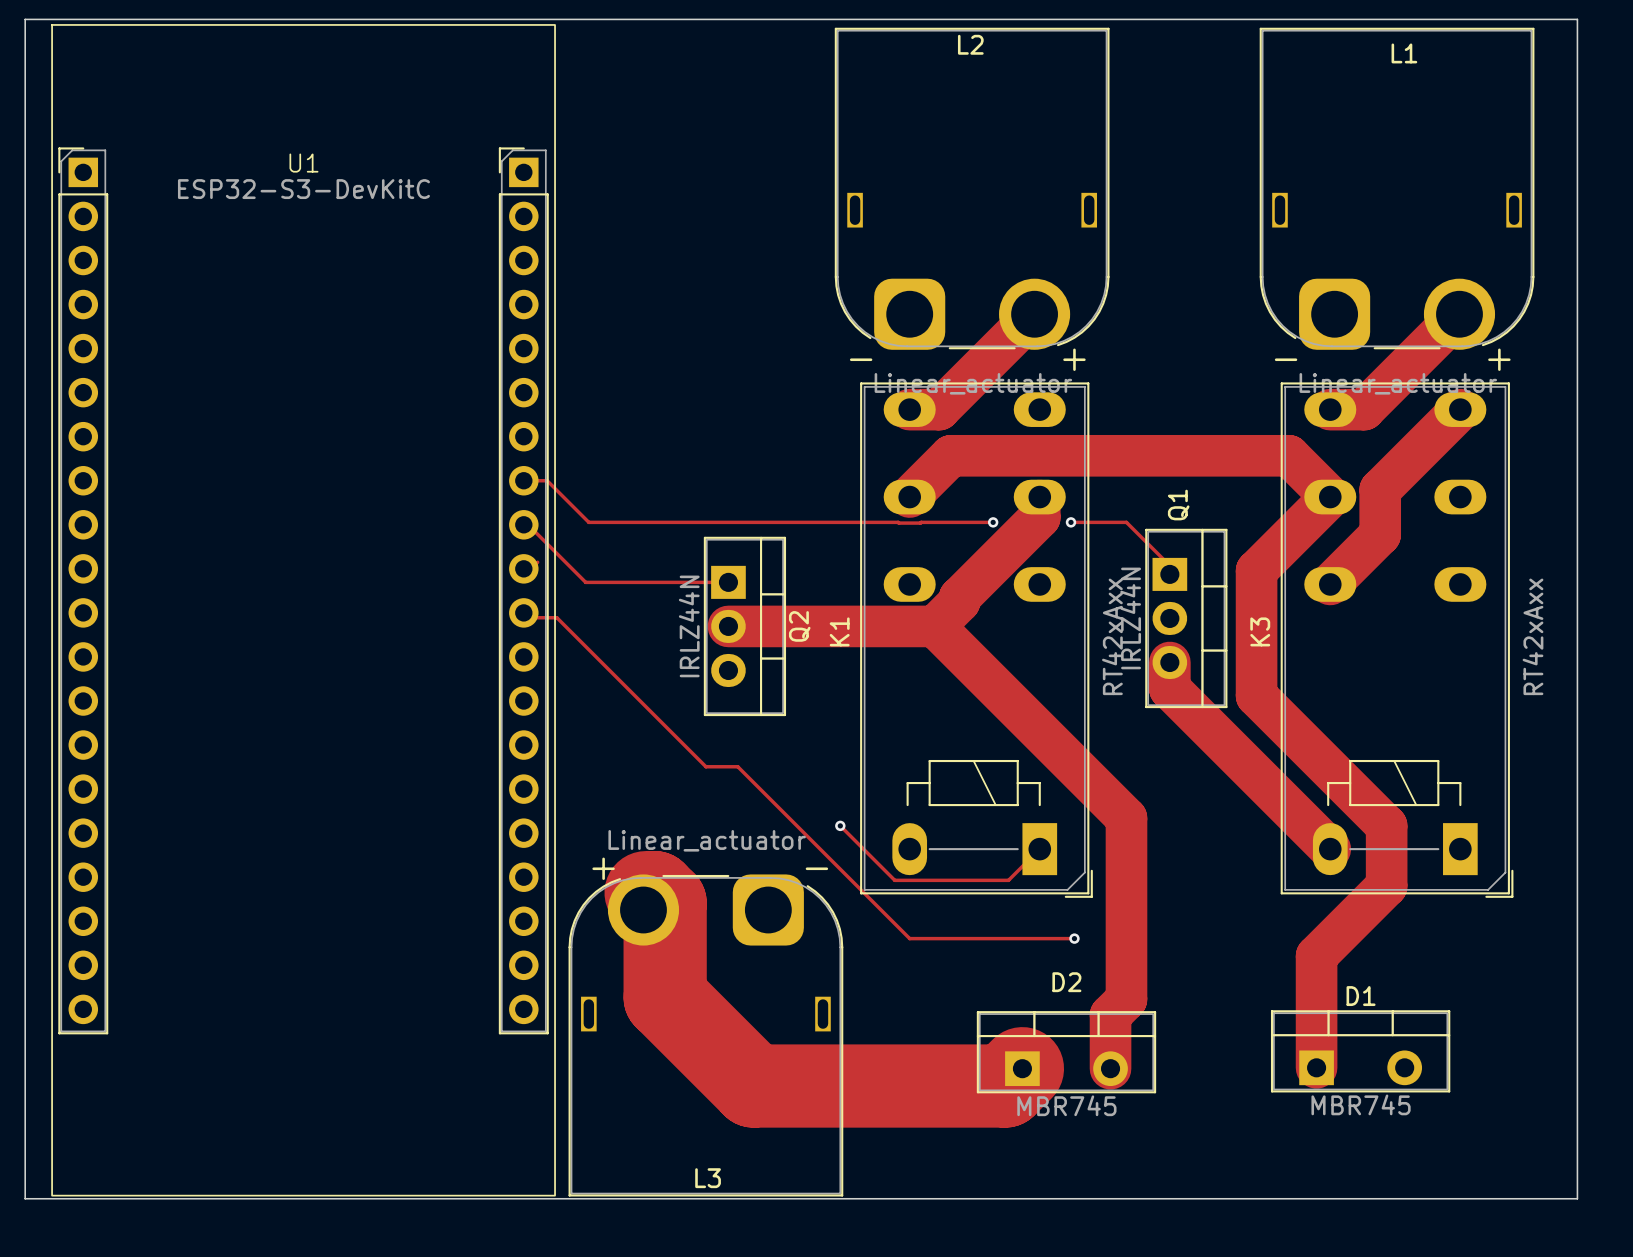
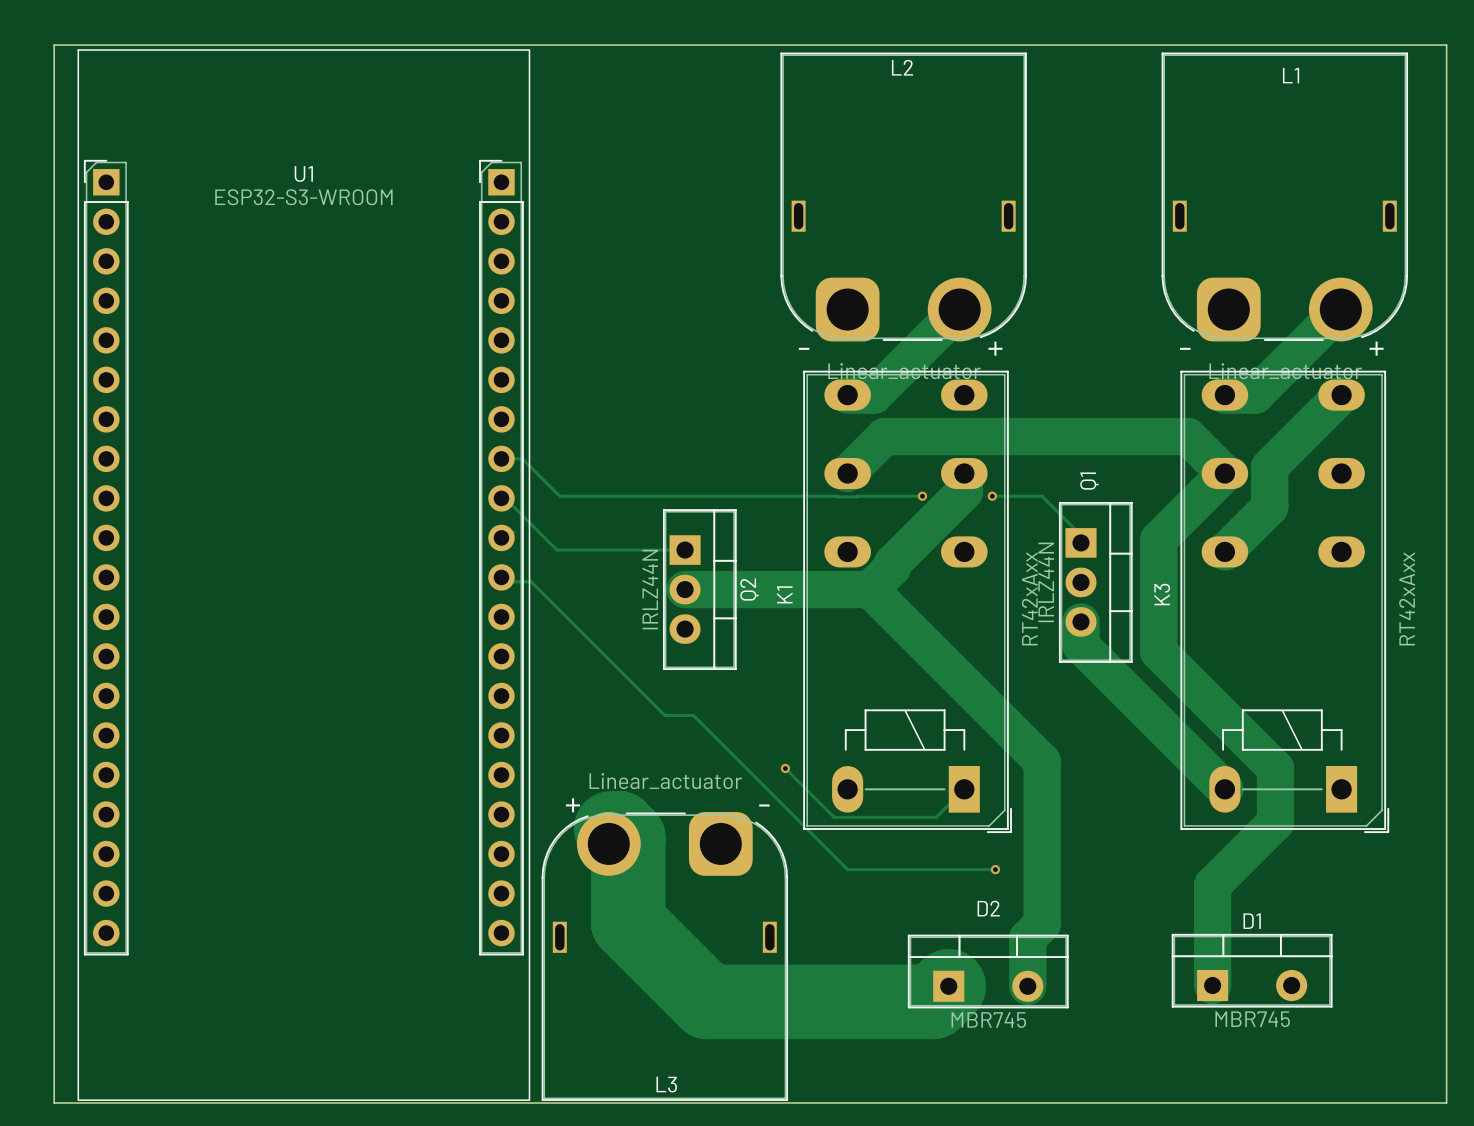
U1 value: ESP32-S3-DevKitC (303, 189) -> ESP32-S3-WROOM (303, 197)

